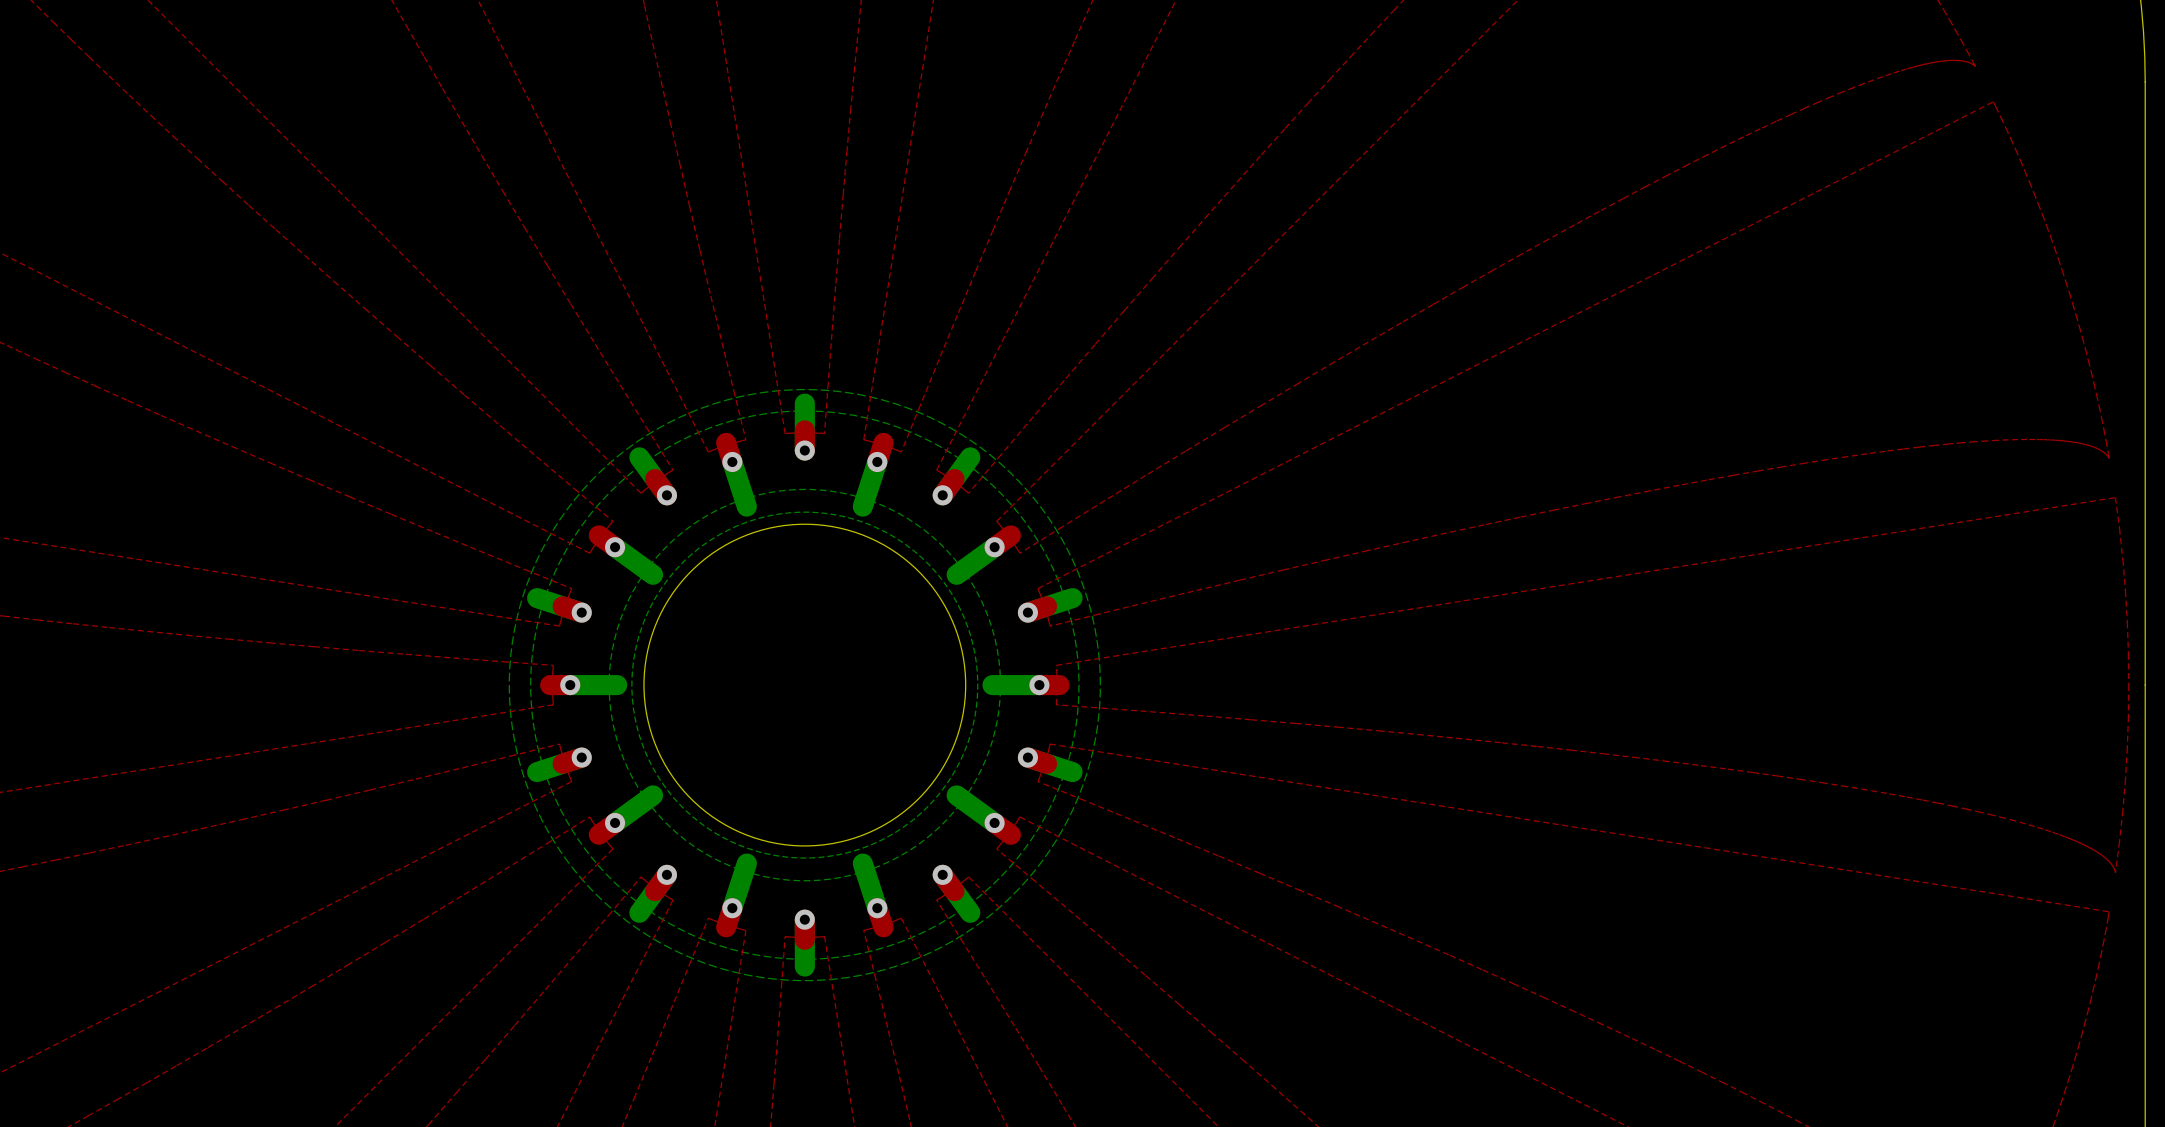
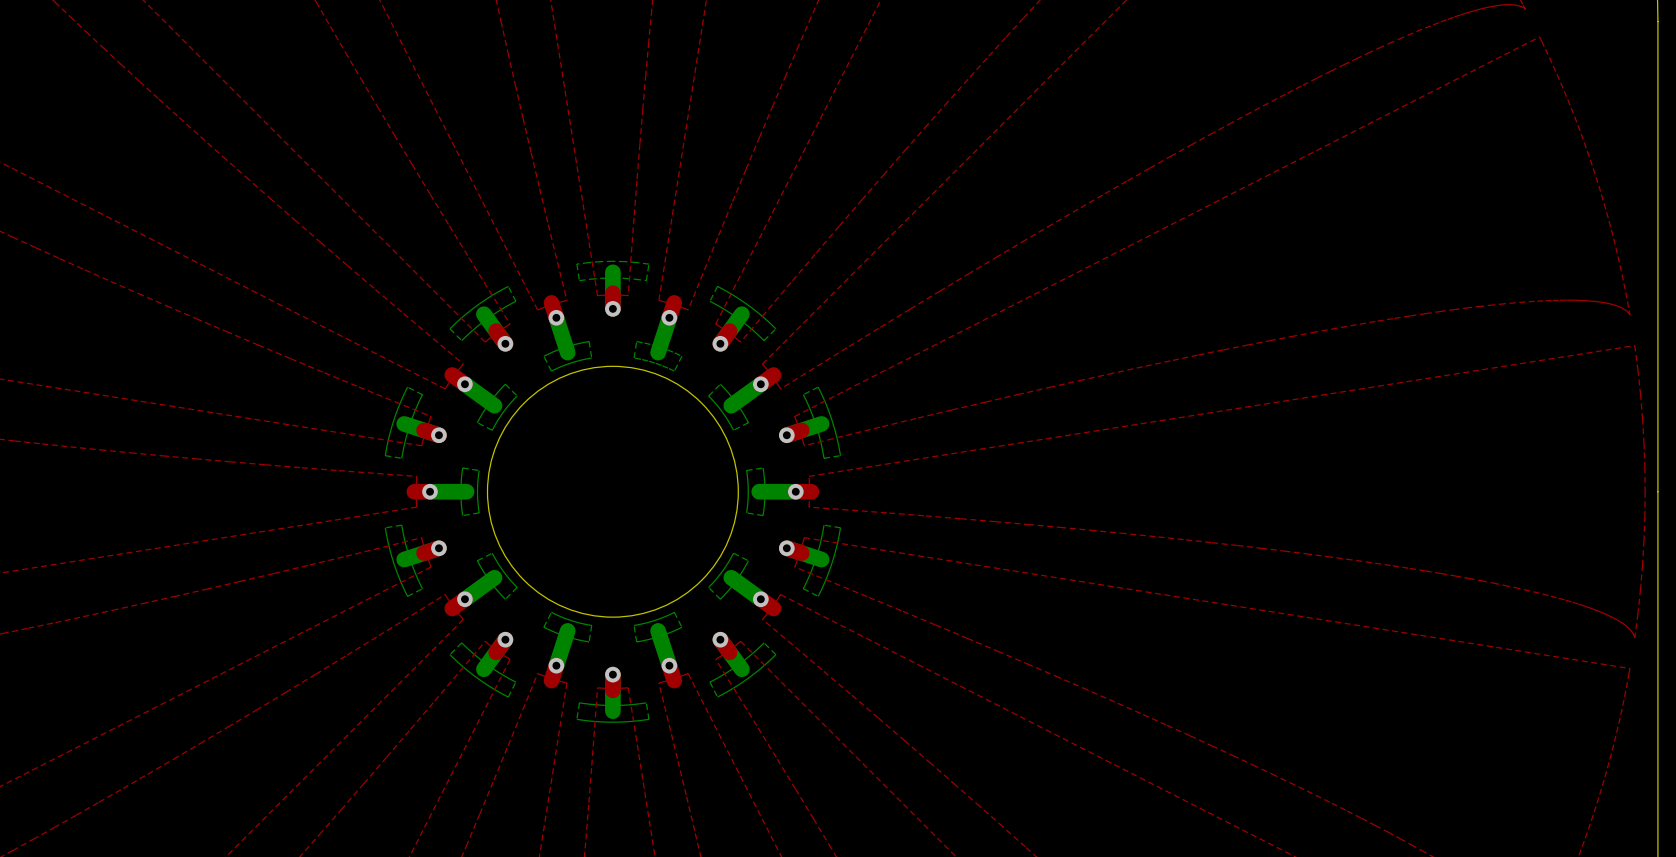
bottom zone outline: none -> (612, 261) (648, 264) (646, 280) (612, 278) (579, 280) (576, 264) (612, 261)
bottom zone outline: none -> (508, 286) (515, 301) (488, 317) (461, 340) (449, 328) (479, 304) (508, 286)
bottom zone outline: none -> (717, 286) (709, 301) (740, 320) (764, 340) (775, 328) (746, 304) (717, 286)
bottom zone outline: (799, 489) (768, 492) (729, 504) (693, 523) (663, 550) (643, 574) (623, 610) (612, 649) (609, 689) (612, 721) (624, 760) (643, 796) (669, 826) (694, 846) (730, 865) (768, 877) (809, 880) (840, 877) (879, 865) (915, 846) (946, 819) (966, 795) (985, 759) (997, 721) (1000, 680) (997, 649) (985, 609) (965, 574) (939, 543) (915, 523) (879, 504) (840, 492) (799, 489) -> none
bottom zone outline: none -> (589, 341) (591, 358) (571, 362) (551, 371) (543, 356) (565, 347) (589, 341)
bottom zone outline: none -> (636, 341) (659, 347) (681, 356) (674, 371) (654, 362) (634, 358) (636, 341)
bottom zone outline: (800, 512) (764, 516) (738, 525) (706, 542) (679, 566) (657, 594) (641, 627) (633, 662) (631, 689) (636, 725) (645, 751) (662, 783) (685, 810) (714, 832) (747, 848) (782, 856) (809, 858) (845, 853) (871, 844) (902, 827) (930, 804) (952, 775) (967, 742) (976, 707) (977, 680) (973, 644) (964, 618) (947, 587) (923, 559) (895, 537) (862, 522) (827, 513) (800, 512) -> none
bottom zone outline: none -> (505, 384) (517, 396) (503, 412) (492, 430) (477, 422) (489, 402) (505, 384)
bottom zone outline: none -> (720, 384) (708, 396) (722, 412) (733, 430) (748, 422) (735, 402) (720, 384)
bottom zone outline: none -> (818, 387) (803, 394) (816, 427) (824, 458) (840, 455) (832, 422) (818, 387)
bottom zone outline: (531, 571) (560, 518) (575, 498) (600, 471) (618, 455) (648, 434) (691, 411) (749, 394) (774, 391) (810, 389) (859, 394) (894, 403) (918, 412) (971, 440) (1009, 471) (1034, 498) (1048, 518) (1077, 571) (1086, 595) (1095, 630) (1100, 679) (1098, 715) (1095, 739) (1077, 798) -> (400, 403) (407, 387) (422, 394) (408, 427) (401, 458) (385, 455) (390, 431) (399, 403)
bottom zone outline: (531, 572) (519, 606) (512, 642) (509, 678) (510, 715) (516, 751) (527, 786) (541, 820) (560, 851) (583, 880) (609, 906) (637, 929) (669, 947) (702, 962) (738, 972) (774, 979) (801, 980) -> (610, 705) (579, 702) (576, 719) (610, 722)
bottom zone outline: none -> (462, 467) (479, 470) (477, 491) (479, 512) (462, 515) (460, 491) (462, 467)
bottom zone outline: none -> (763, 467) (746, 470) (748, 491) (746, 512) (763, 515) (764, 491) (763, 467)
bottom zone outline: none -> (401, 525) (408, 555) (422, 588) (407, 596) (394, 565) (385, 527) (401, 525)
bottom zone outline: none -> (492, 553) (477, 560) (489, 581) (505, 599) (517, 587) (503, 571) (492, 553)
bottom zone outline: none -> (733, 553) (722, 571) (708, 587) (720, 599) (735, 581) (748, 560) (733, 553)
bottom zone outline: (1077, 798) (1055, 841) (1034, 871) (1000, 906) (971, 929) (929, 953) (894, 966) (847, 977) (807, 980) -> (825, 580) (818, 596) (803, 588) (815, 559) (824, 525) (840, 527) (835, 552) (825, 579)
bottom zone outline: none -> (551, 612) (543, 627) (565, 636) (589, 641) (591, 625) (571, 620) (551, 612)
bottom zone outline: none -> (674, 612) (654, 620) (634, 625) (636, 641) (659, 636) (681, 627) (674, 612)
bottom zone outline: none -> (461, 642) (488, 665) (515, 682) (508, 697) (475, 676) (449, 654) (461, 642)
bottom zone outline: none -> (764, 642) (775, 654) (746, 679) (717, 697) (709, 682) (740, 663) (764, 642)
bottom zone outline: (802, 959) (754, 954) (699, 938) (659, 917) (615, 882) (585, 848) (556, 800) (537, 746) (530, 690) (535, 634) (551, 580) (572, 539) (607, 495) (640, 465) (689, 436) (743, 417) (799, 410) (855, 415) (909, 431) (950, 452) (994, 487) (1024, 521) (1053, 569) (1071, 623) (1078, 679) (1074, 735) (1058, 790) (1037, 830) (1002, 874) (959, 911) (909, 938) (855, 954) (807, 959) -> (615, 722) (648, 719) (646, 702) (615, 705)

